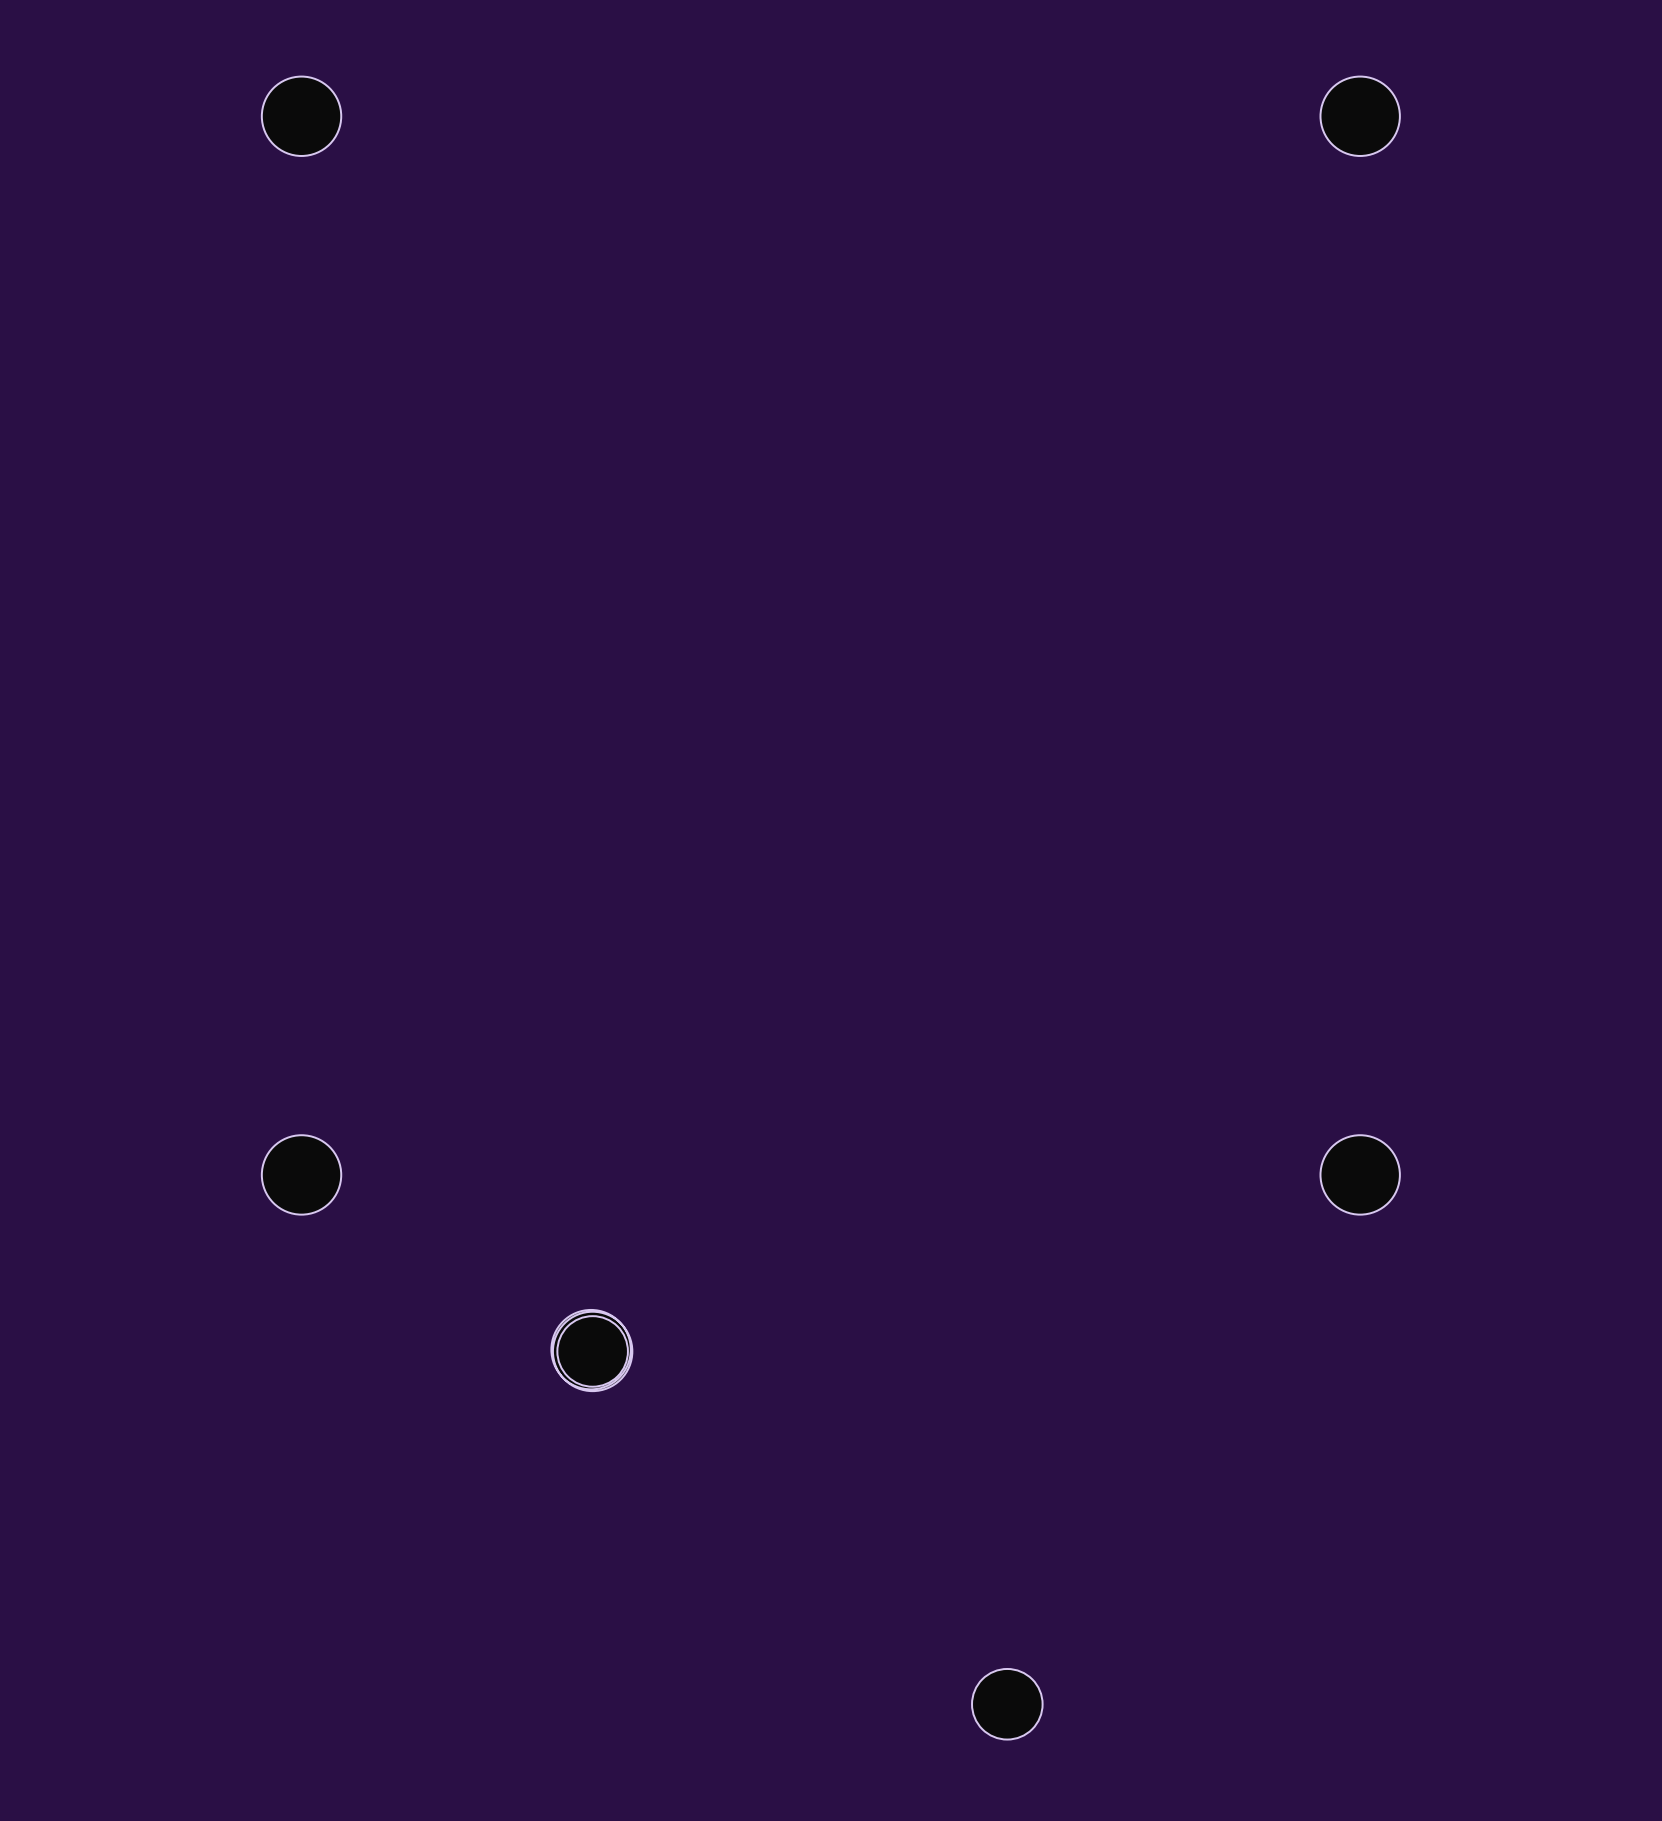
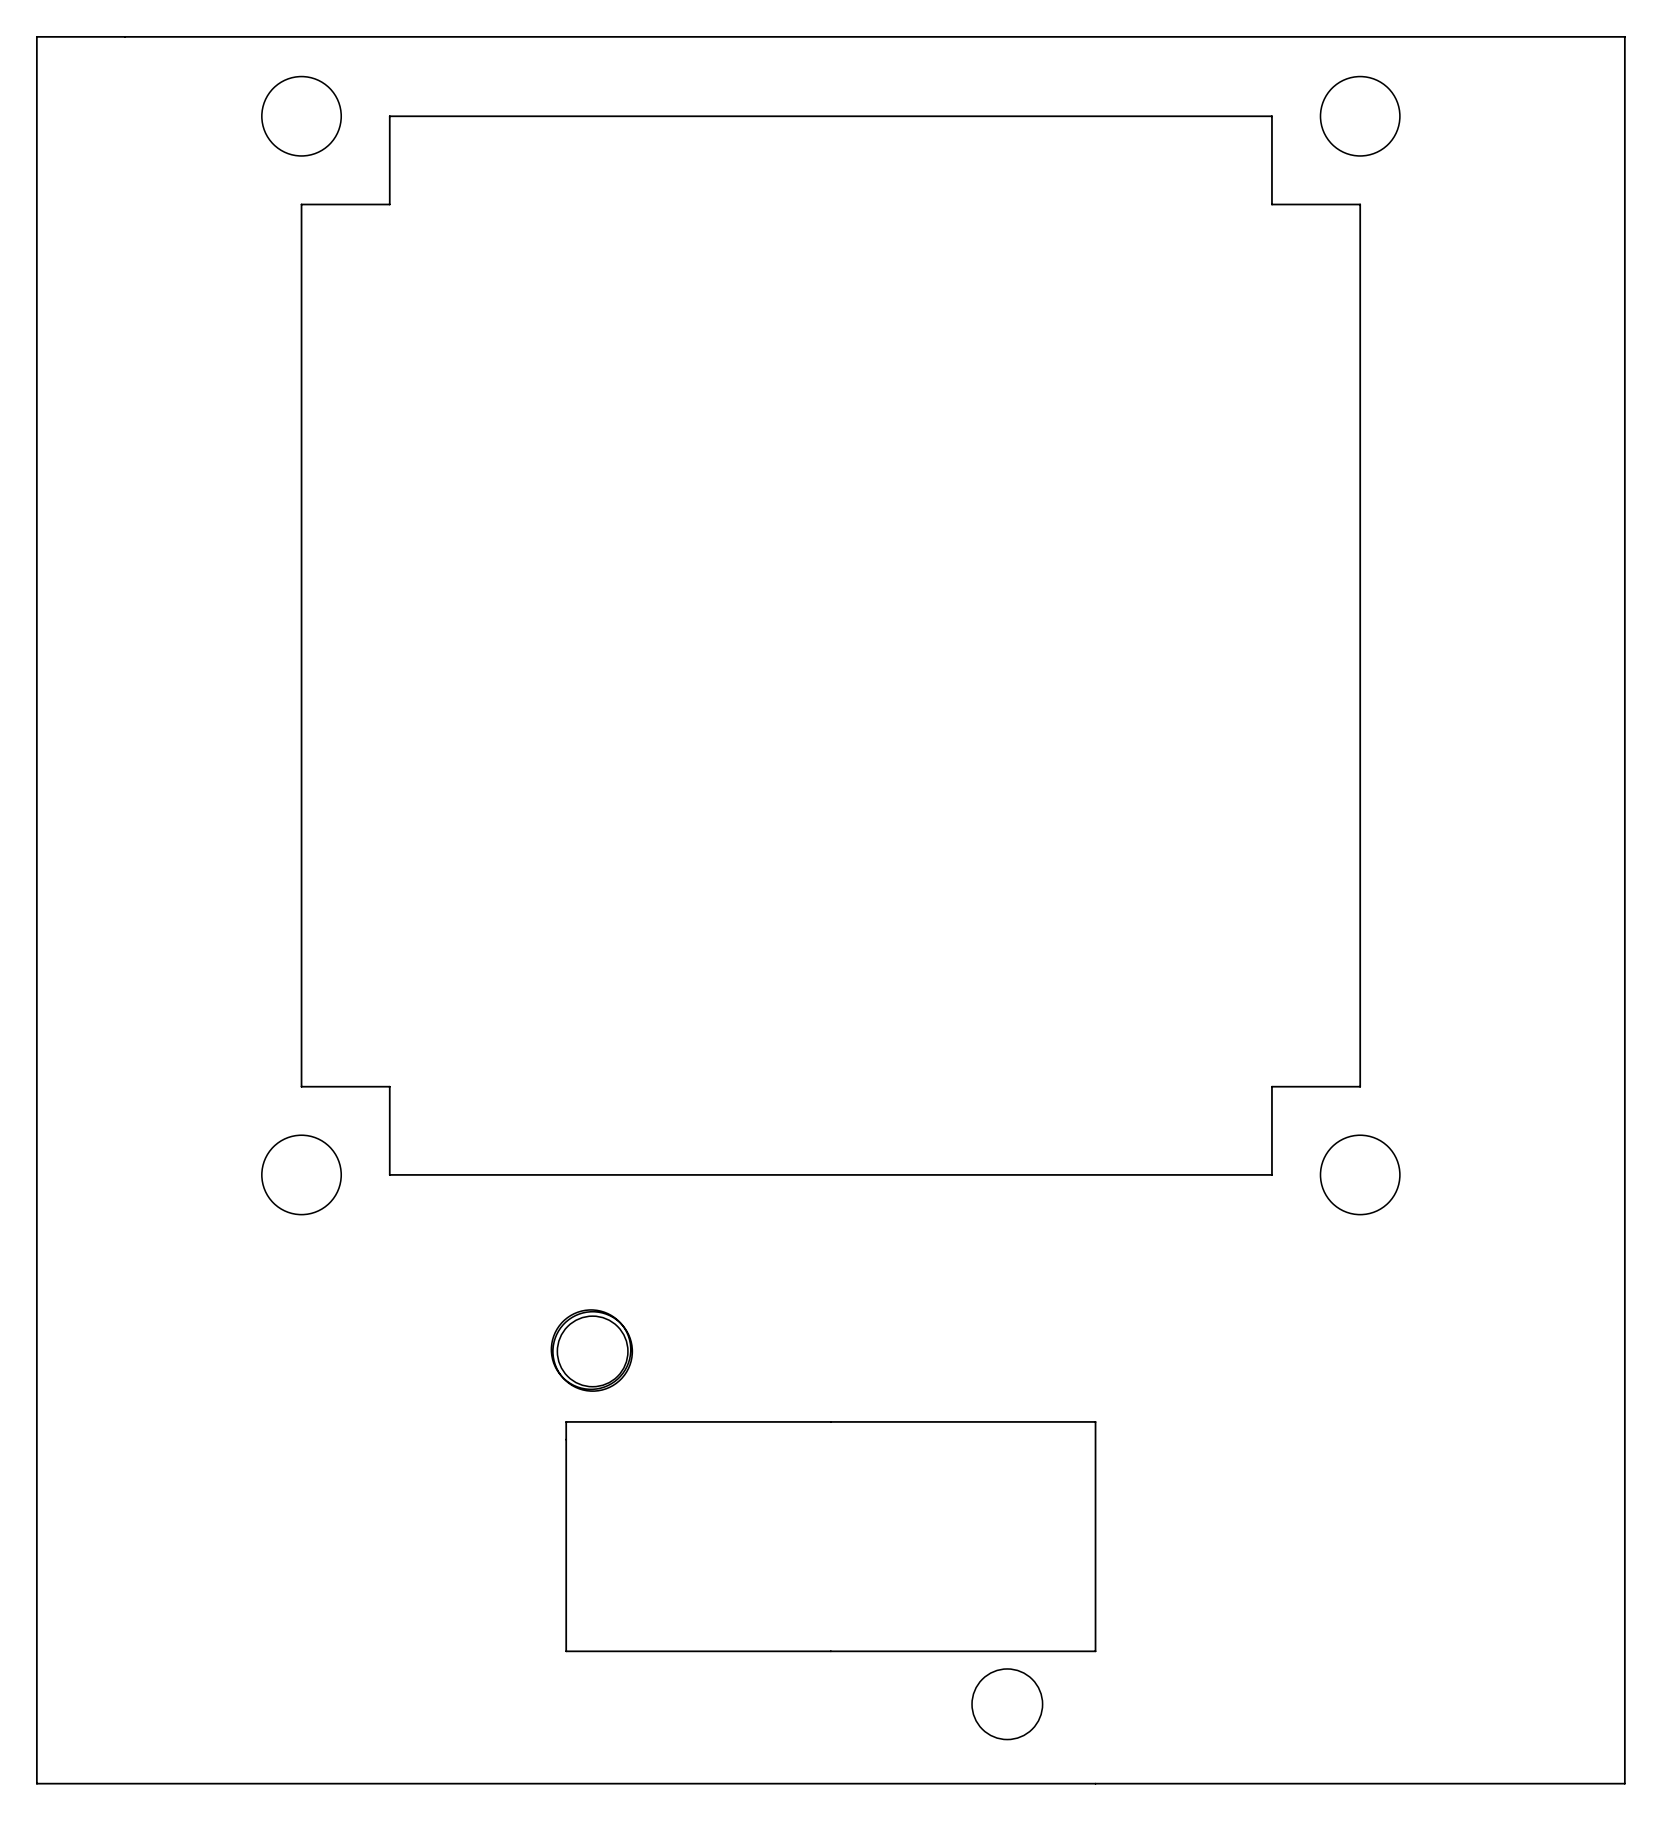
board edge: none -> (1624, 36) (1624, 1783) (36, 1783) (36, 36) (1624, 36)
board edge: none -> (1271, 116) (1271, 204) (1360, 204) (1360, 1086) (1271, 1086) (1271, 1174) (389, 1174) (389, 1086) (301, 1086) (301, 204) (389, 204) (389, 116) (1271, 116)
board edge: none -> (1095, 1421) (566, 1421) (566, 1651) (1095, 1651) (1095, 1421)

